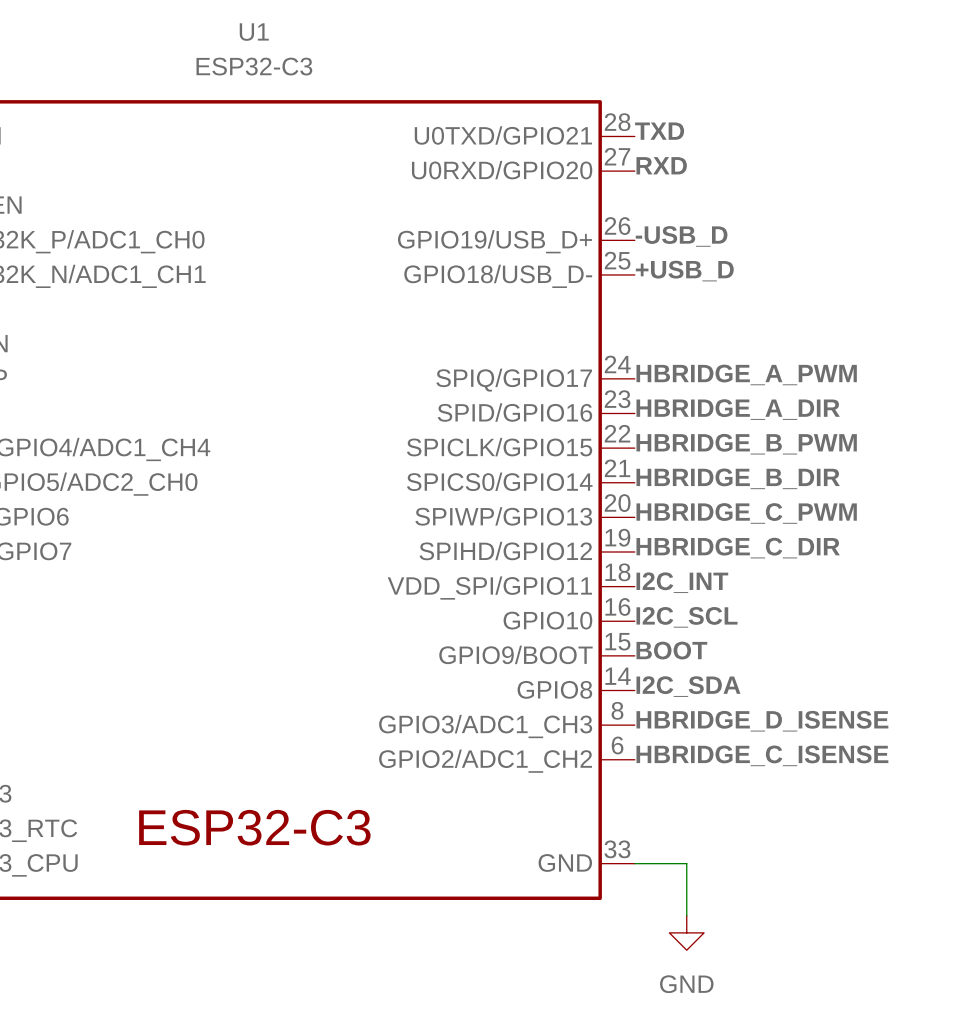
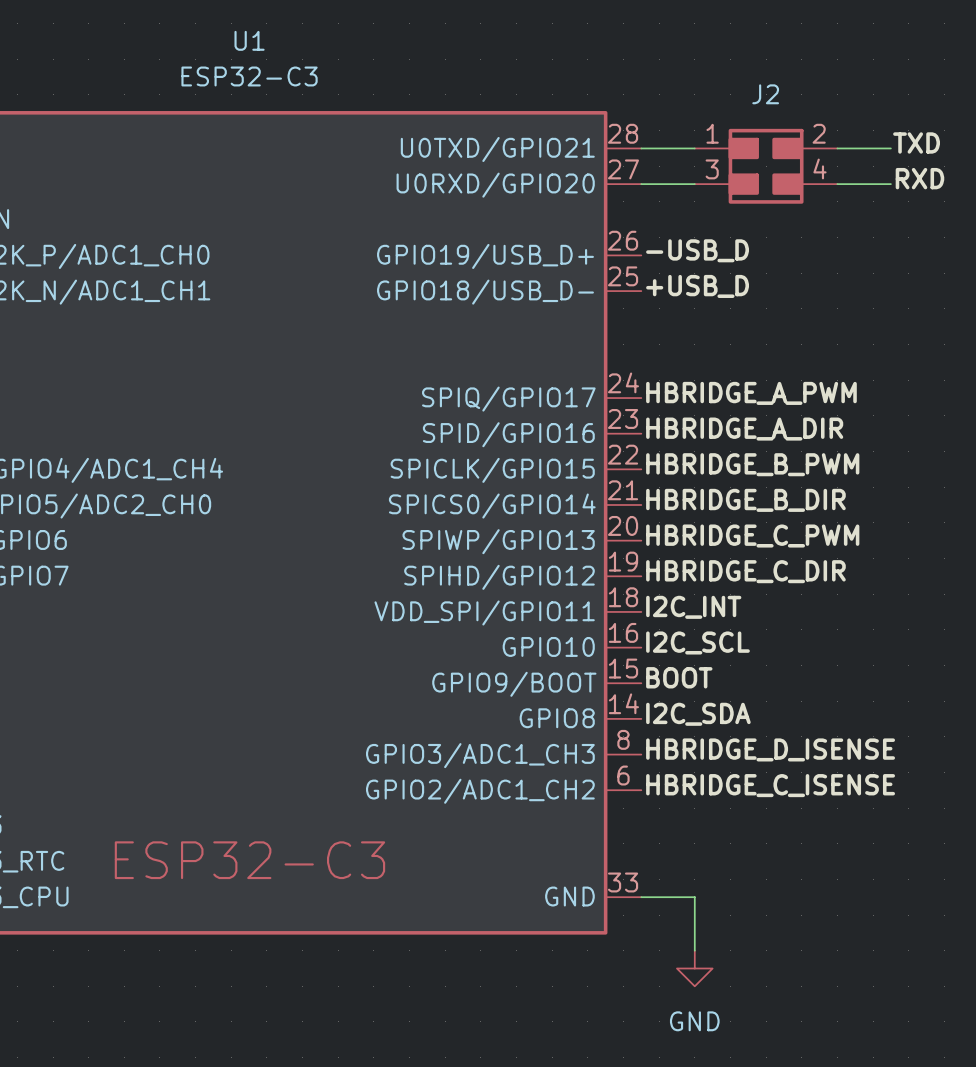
label position: TXD (659, 131) -> TXD (916, 142)
wire: none -> (641, 148) (694, 148)
wire: none -> (837, 148) (890, 148)
J2: none -> (766, 166)
label position: RXD (661, 165) -> RXD (919, 178)
wire: none -> (641, 184) (694, 184)
wire: none -> (837, 184) (890, 184)

